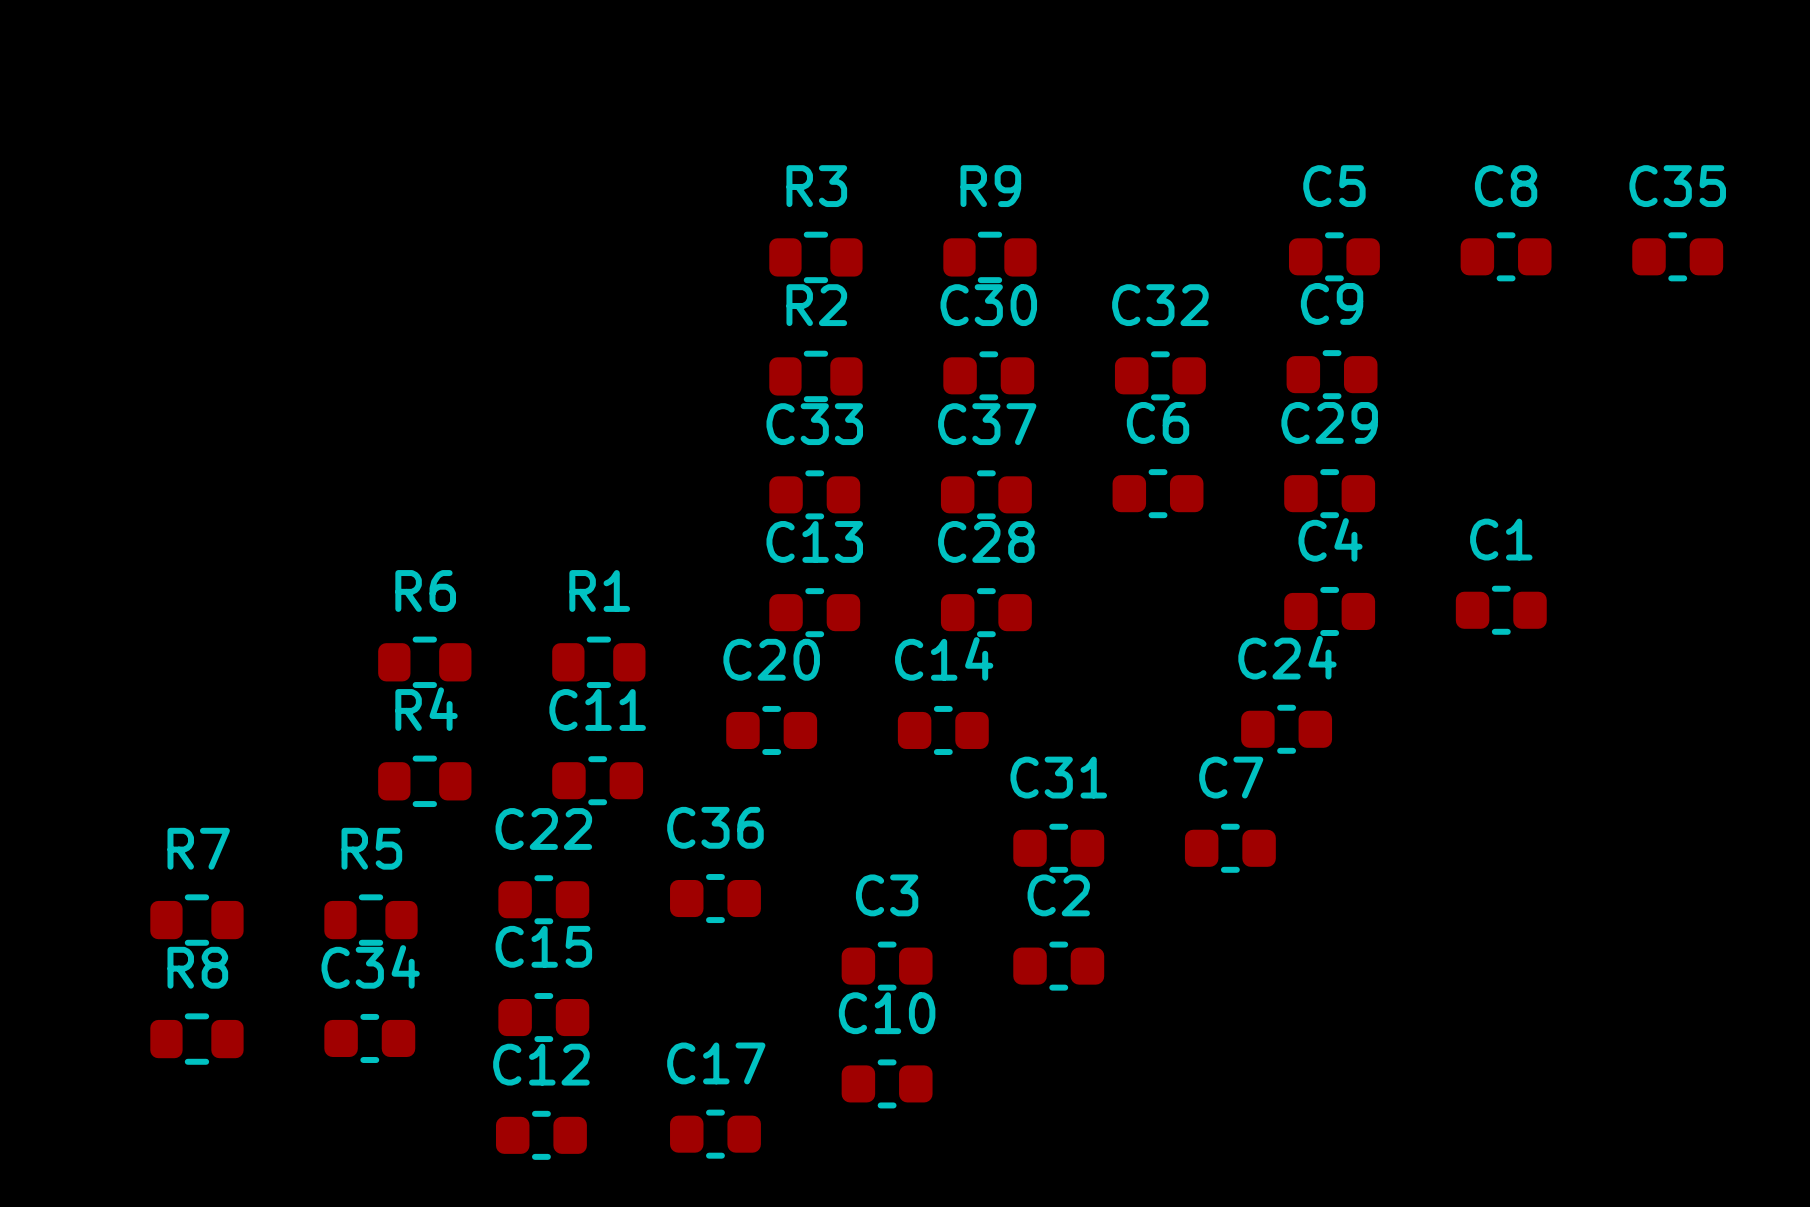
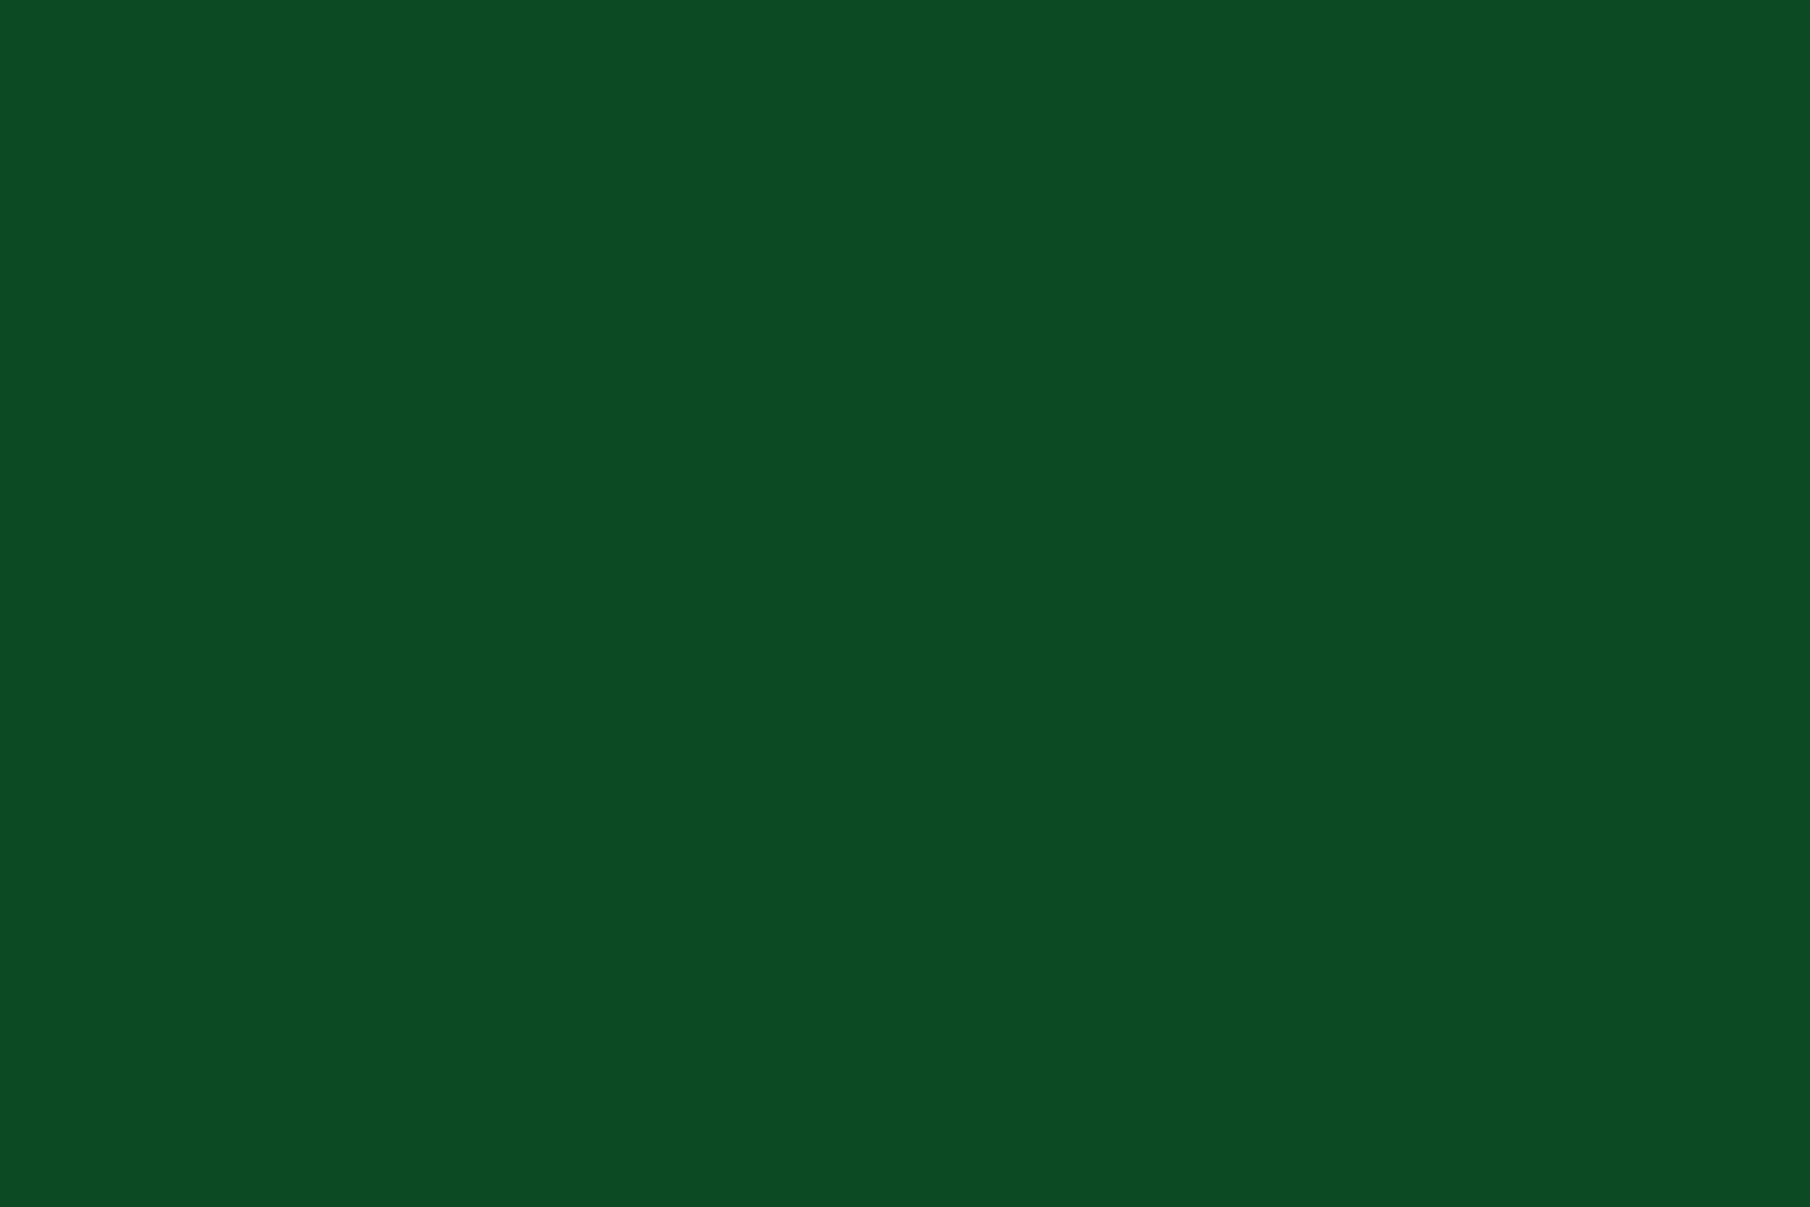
C5: (1334, 256) -> none
C8: (1506, 256) -> none
C35: (1677, 256) -> none
R3: (815, 257) -> none
R9: (989, 257) -> none
C9: (1332, 374) -> none
C30: (988, 375) -> none
C32: (1160, 375) -> none
R2: (815, 376) -> none
C6: (1158, 493) -> none
C29: (1329, 493) -> none
C33: (814, 494) -> none
C37: (986, 494) -> none
C1: (1501, 610) -> none
C4: (1329, 611) -> none
C13: (814, 612) -> none
C28: (986, 612) -> none
R6: (424, 662) -> none
R1: (598, 662) -> none
C24: (1286, 729) -> none
C20: (771, 730) -> none
C14: (943, 730) -> none
C11: (597, 780) -> none
R4: (424, 781) -> none
C31: (1058, 848) -> none
C7: (1230, 848) -> none
C36: (715, 898) -> none
C22: (543, 899) -> none
R7: (196, 920) -> none
R5: (370, 920) -> none
C3: (887, 966) -> none
C2: (1058, 966) -> none
C15: (543, 1017) -> none
C34: (369, 1038) -> none
R8: (196, 1039) -> none
C10: (887, 1083) -> none
C17: (715, 1134) -> none
C12: (541, 1135) -> none

